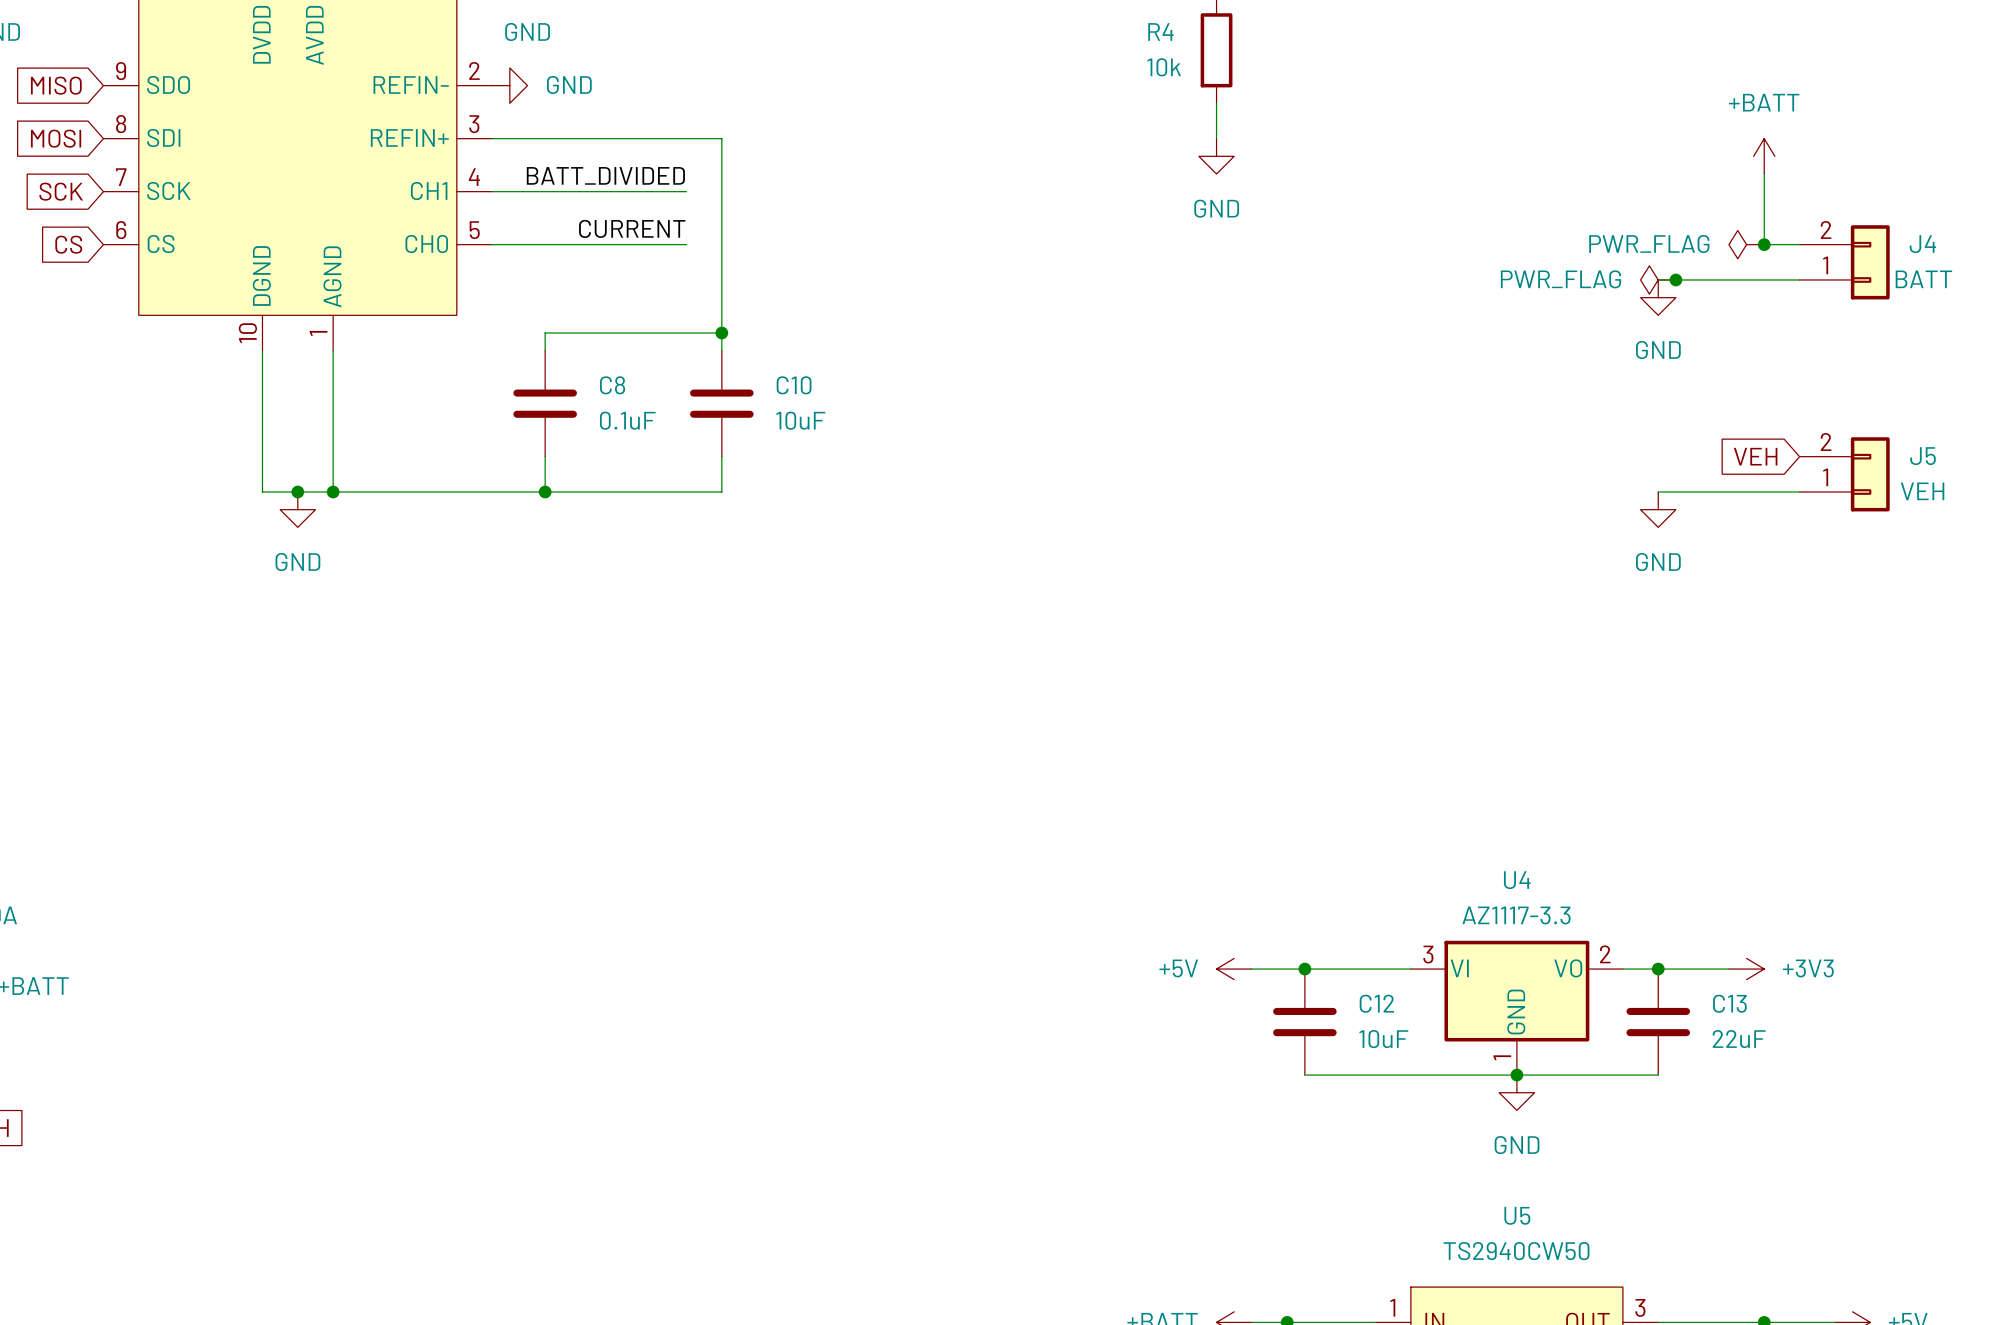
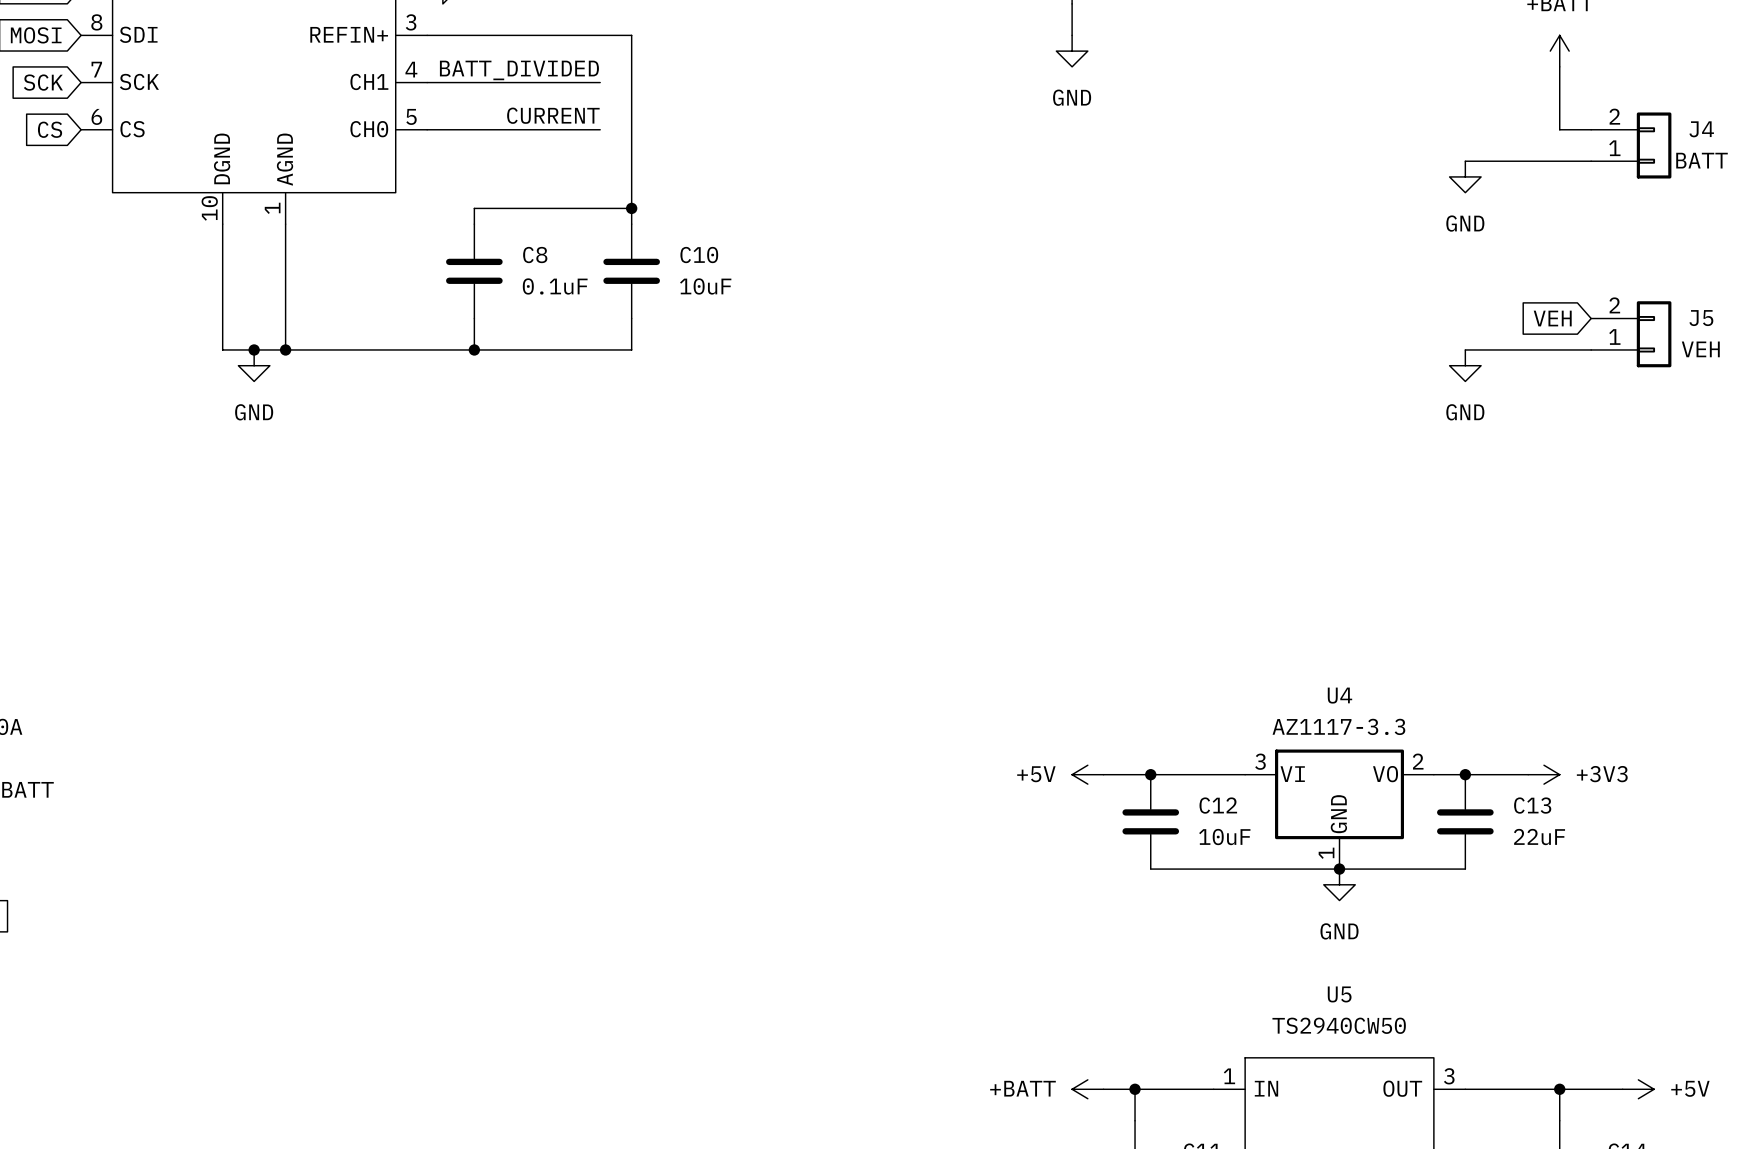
power symbol: PWR_FLAG (1746, 244) -> none
junction: (1764, 244) -> none
power symbol: PWR_FLAG (1658, 279) -> none
junction: (1675, 279) -> none

